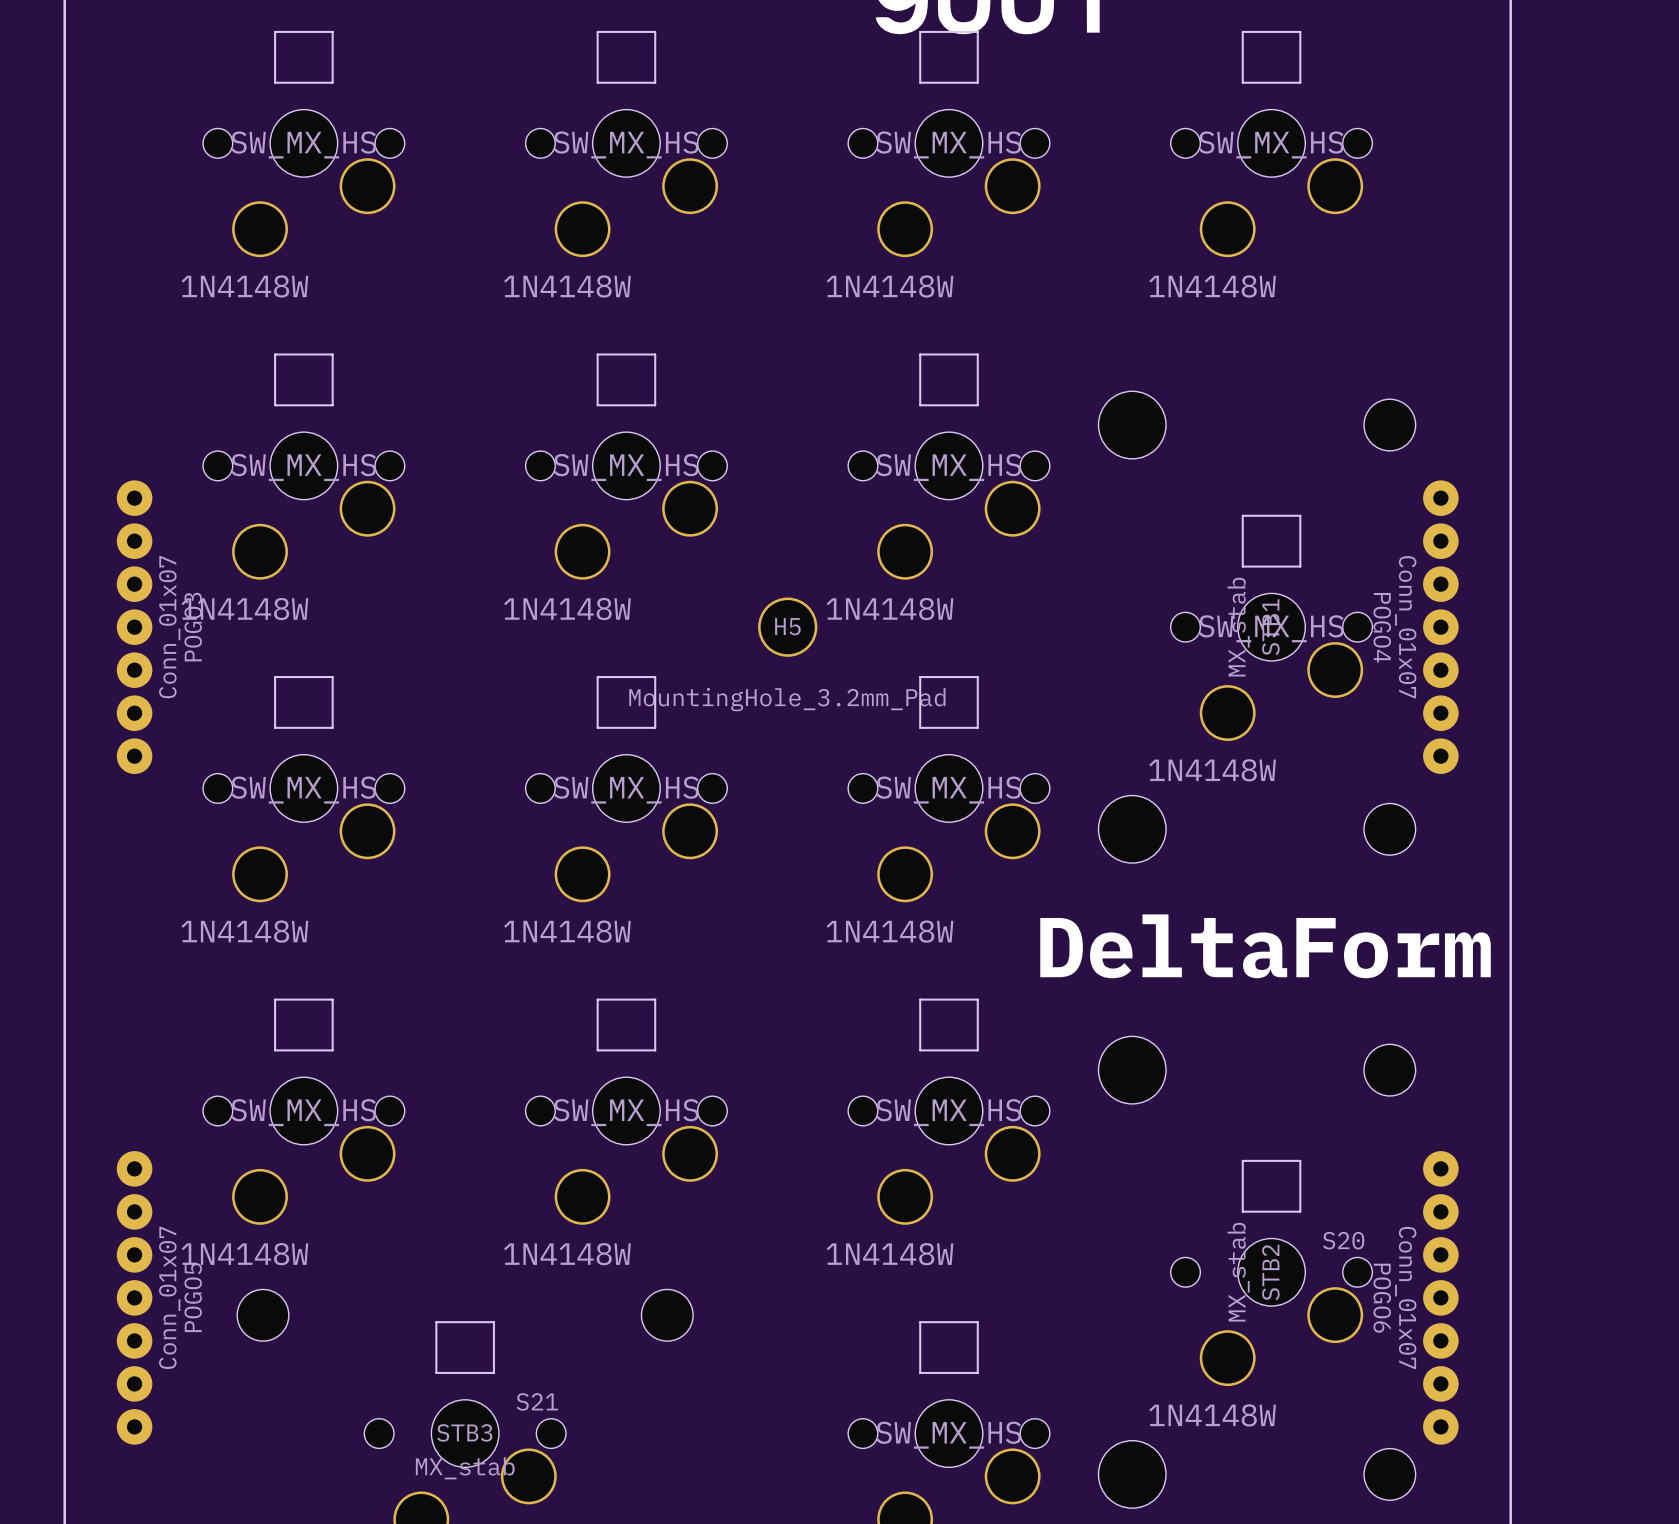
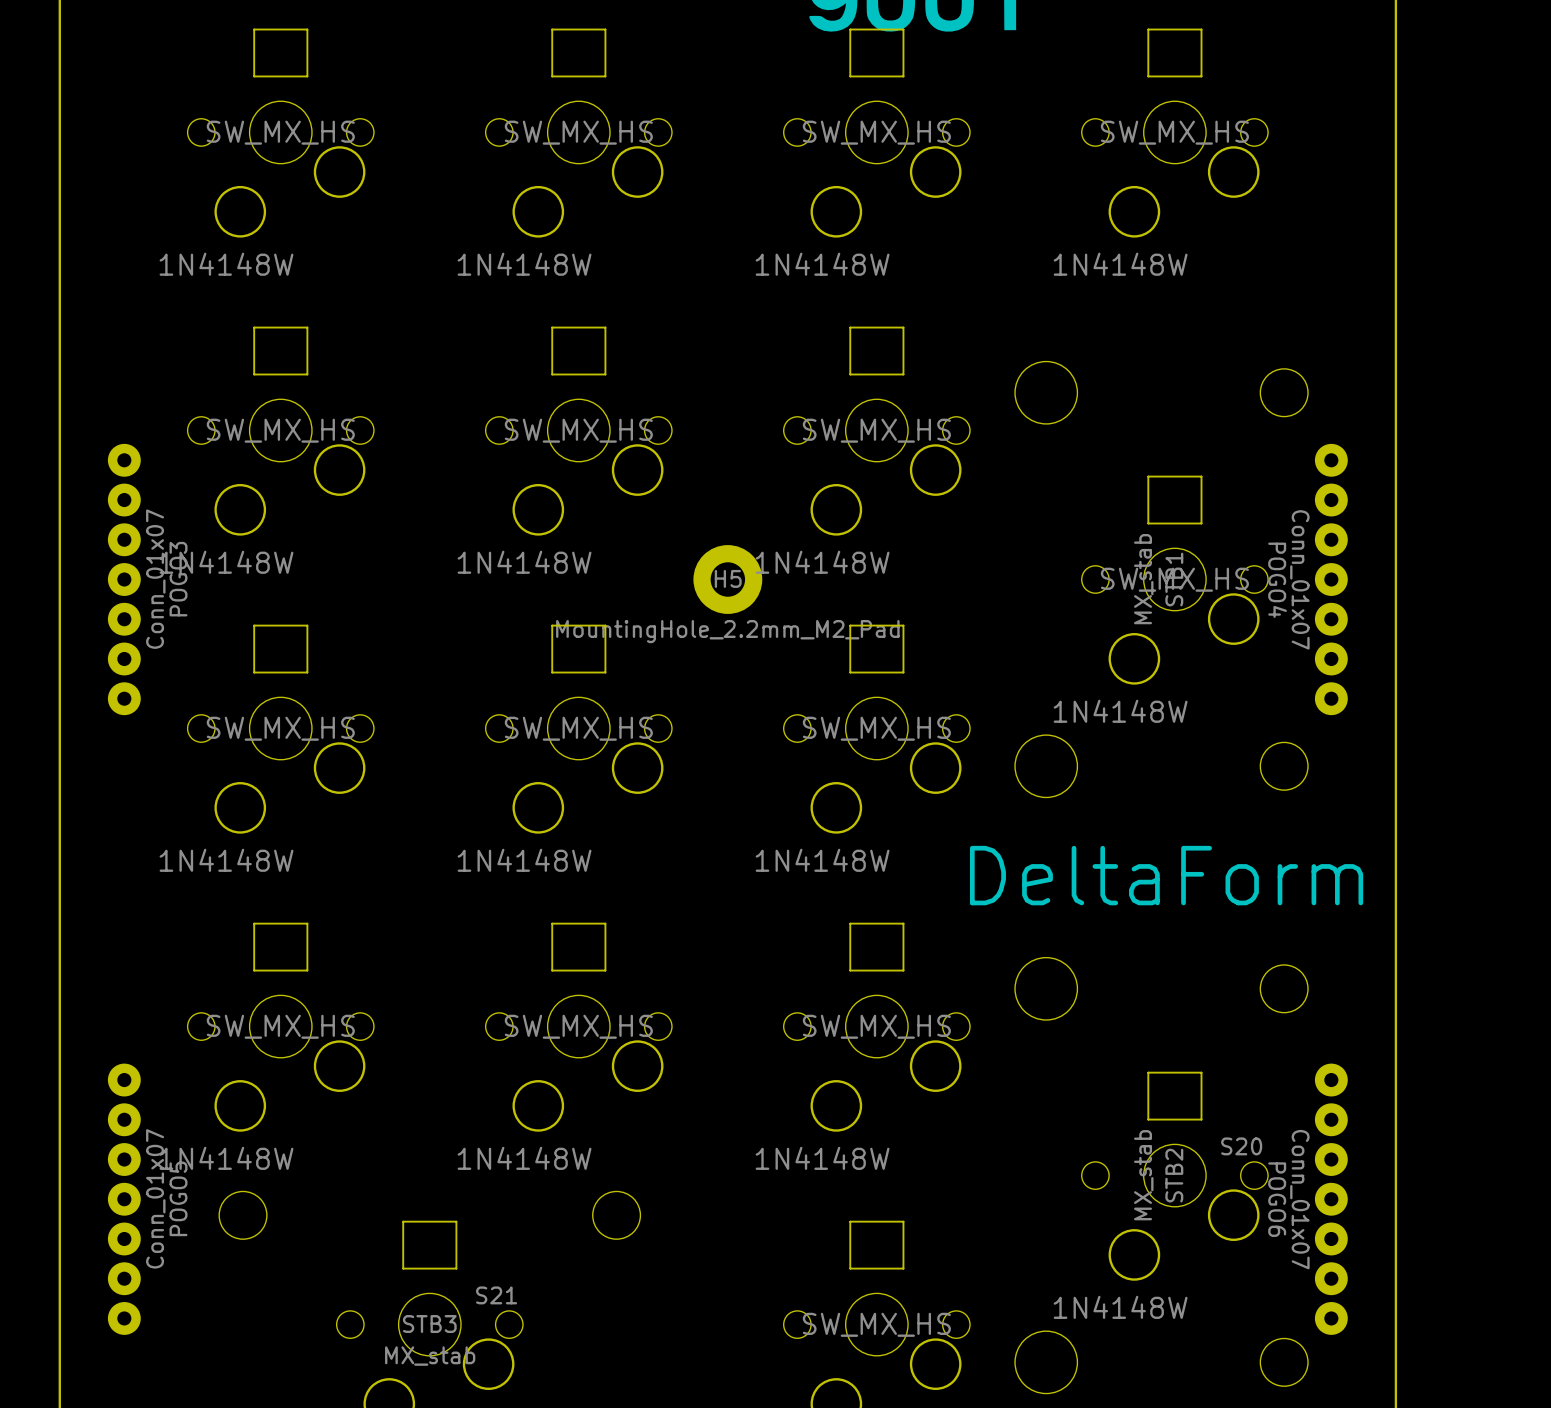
H5 footprint: [758, 597, 818, 657] -> [693, 545, 763, 614]
H5 value: MountingHole_3.2mm_Pad (787, 699) -> MountingHole_2.2mm_M2_Pad (727, 631)

